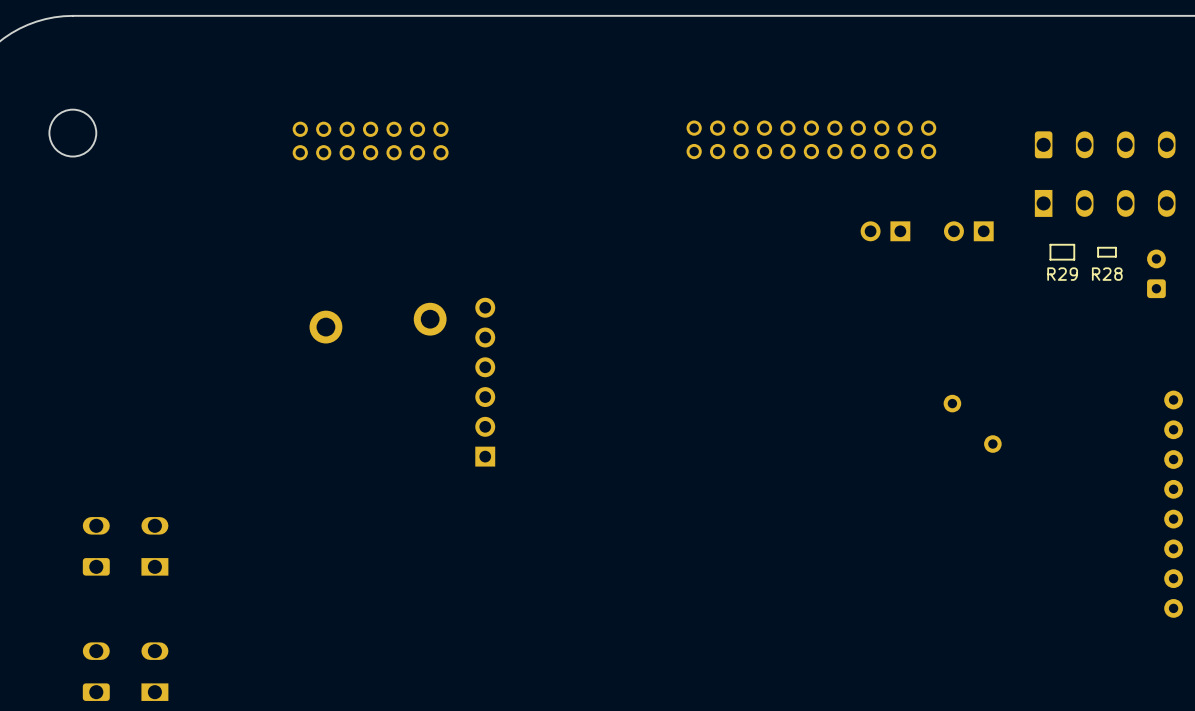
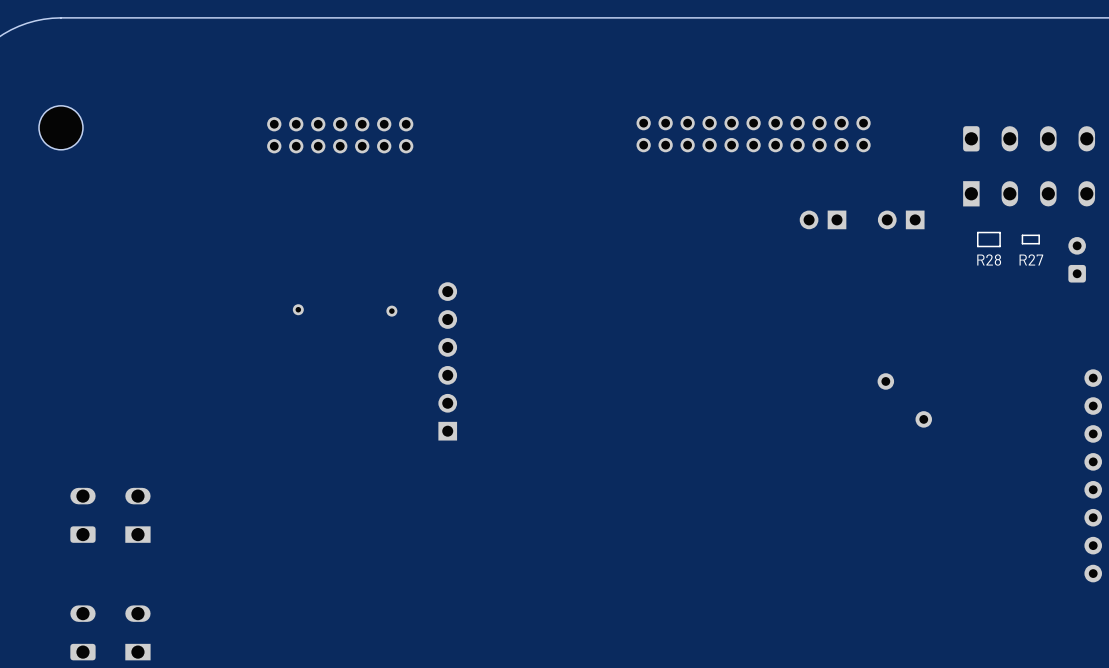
R29 name: R29 (1062, 274) -> R28 (989, 260)
R28 name: R28 (1107, 274) -> R27 (1031, 259)
part footprint: [413, 302, 447, 336] -> [386, 305, 398, 317]
part footprint: [309, 310, 343, 344] -> [292, 304, 304, 316]

